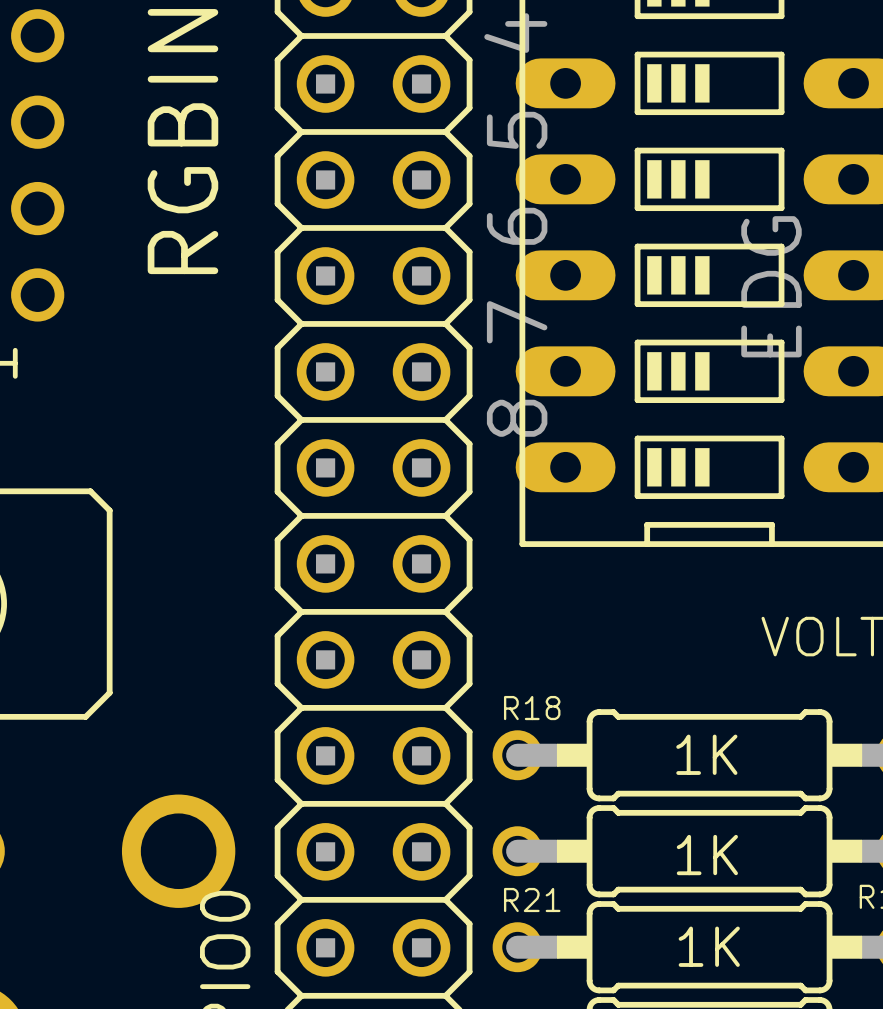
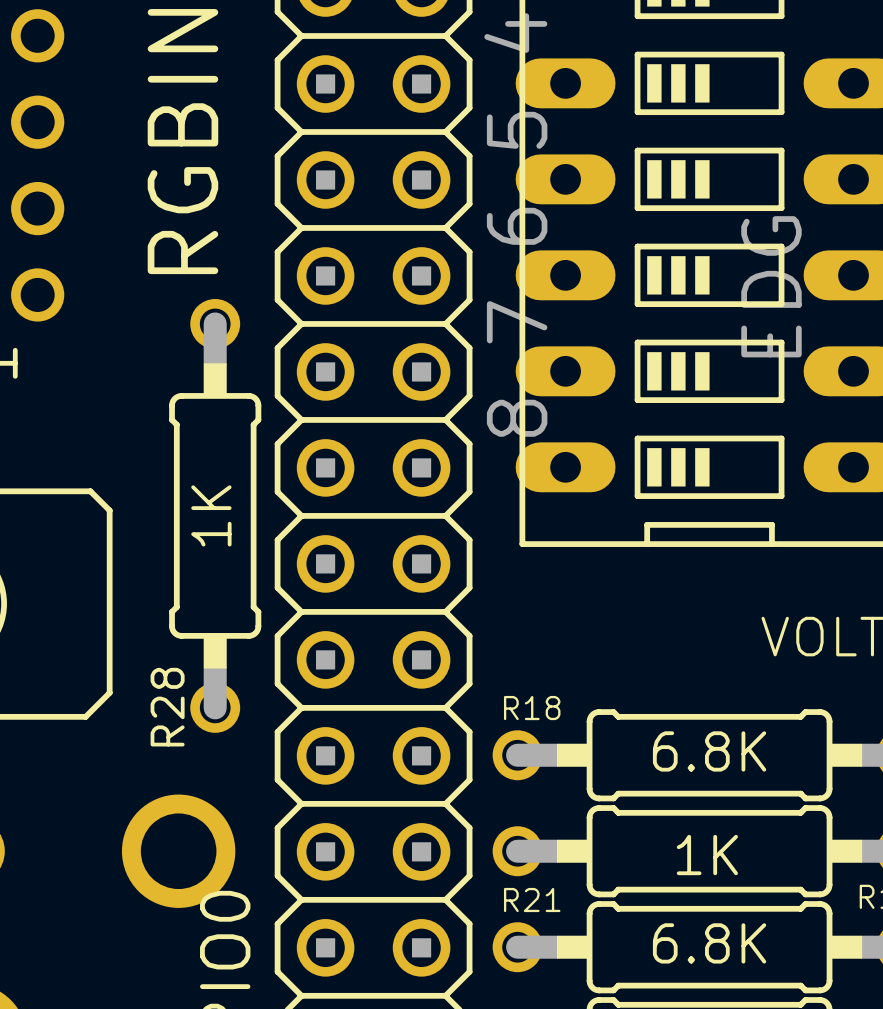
R28: none -> 1K (215, 515)
R18 value: 1K (706, 754) -> 6.8K (709, 751)
R21 value: 1K (709, 946) -> 6.8K (709, 943)

